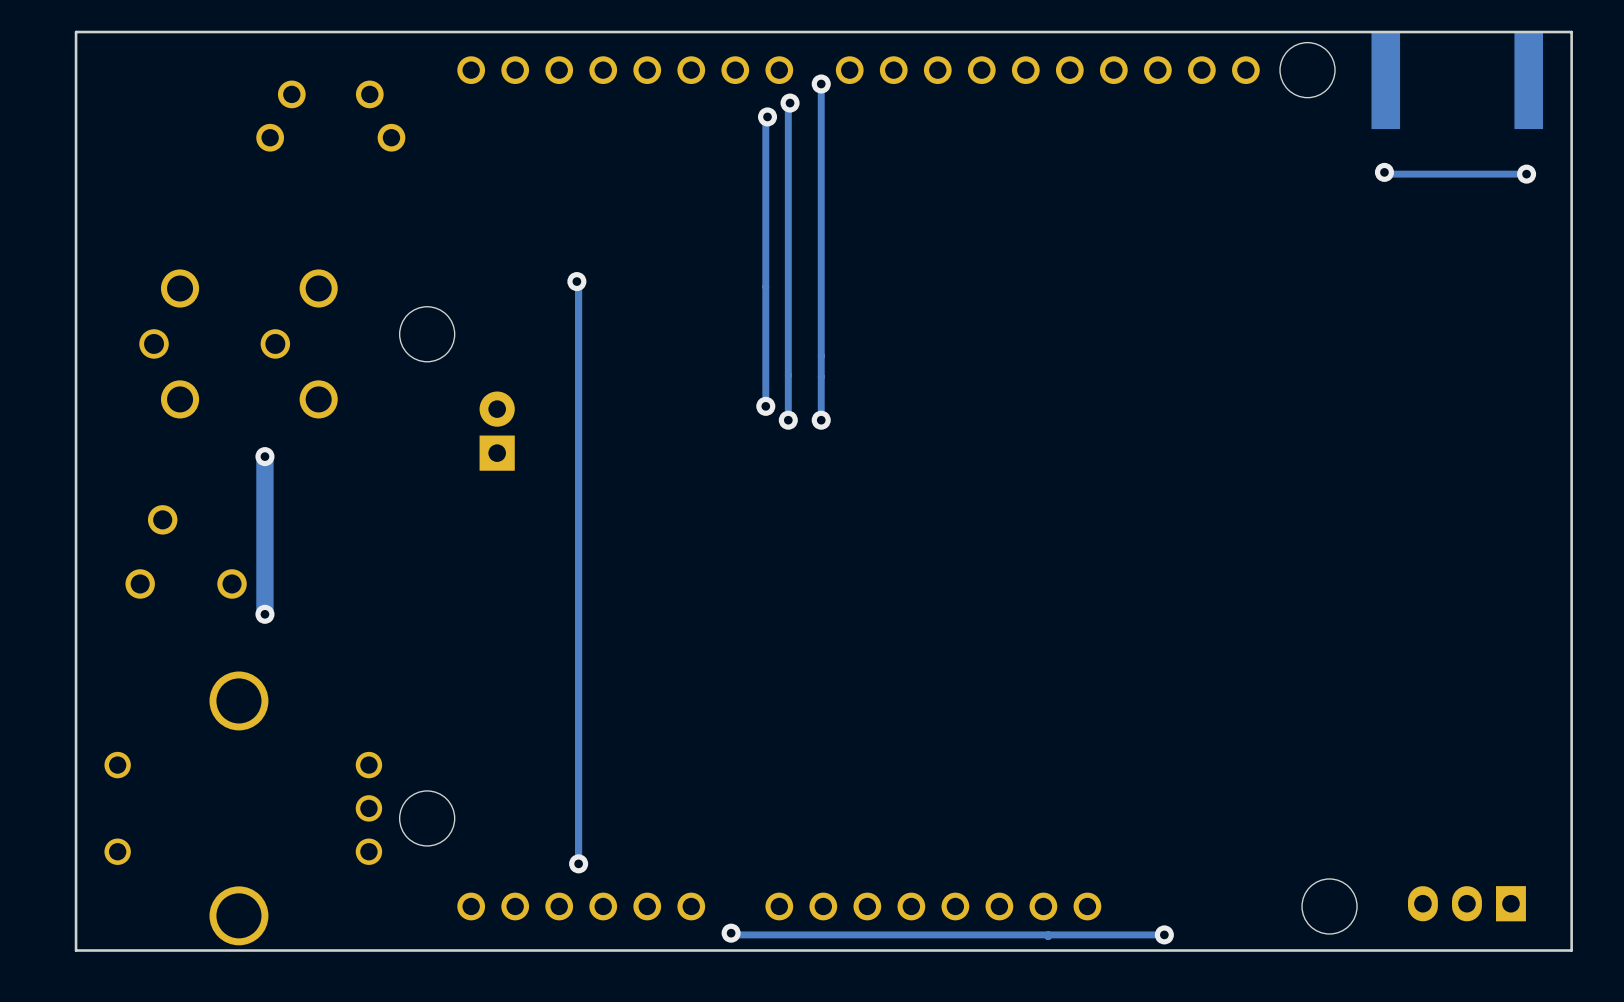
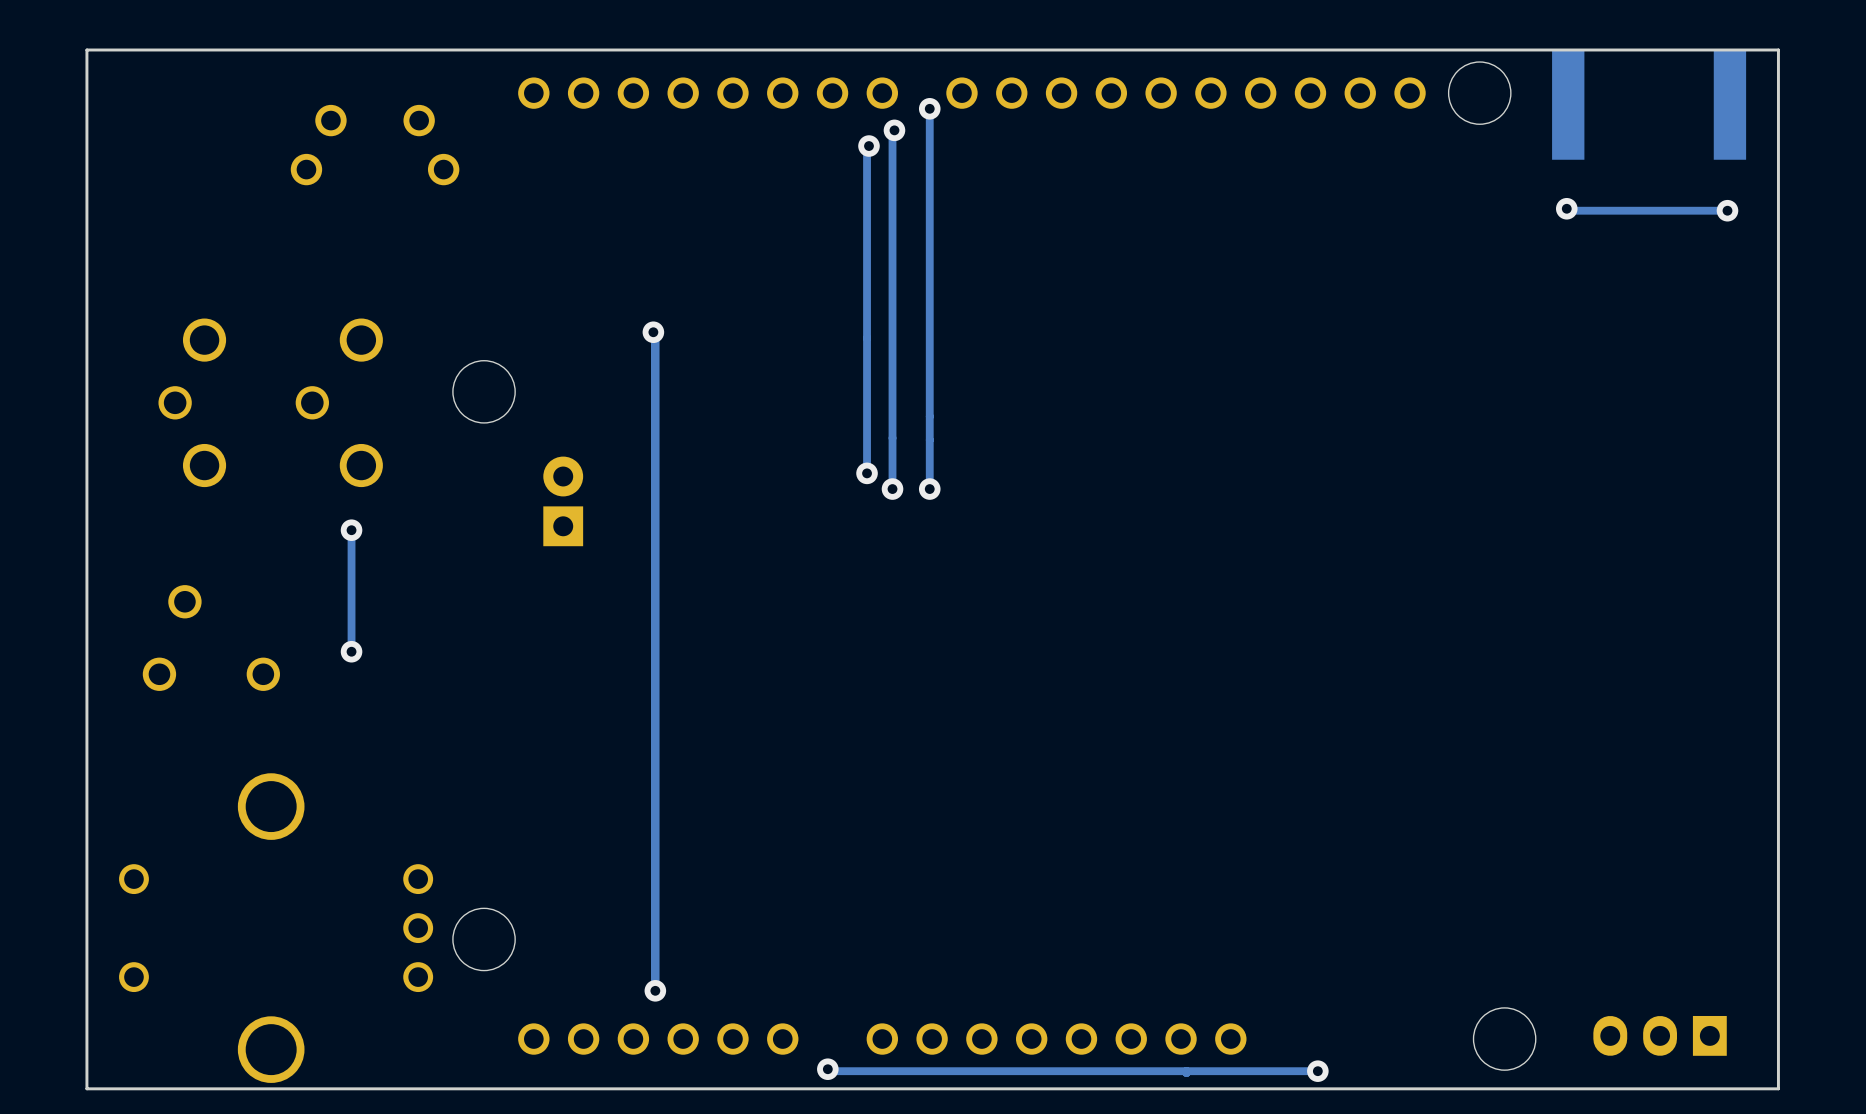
track: (264, 456) (264, 614) -> none
via position: (264, 456) -> (351, 530)
track: none -> (351, 530) (351, 653)
via: none -> (351, 651)
via: (264, 614) -> none

